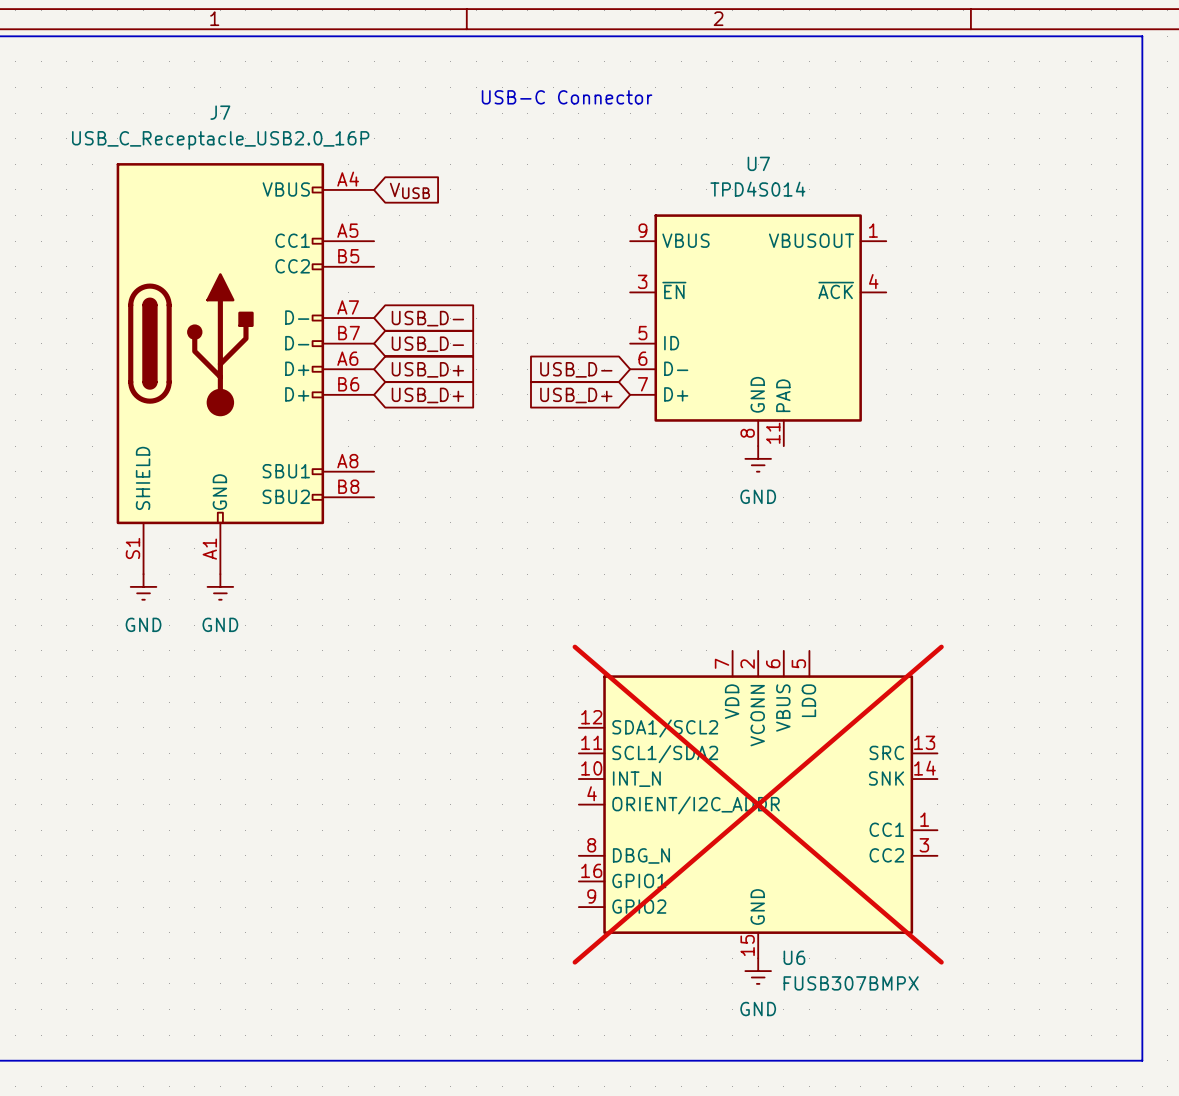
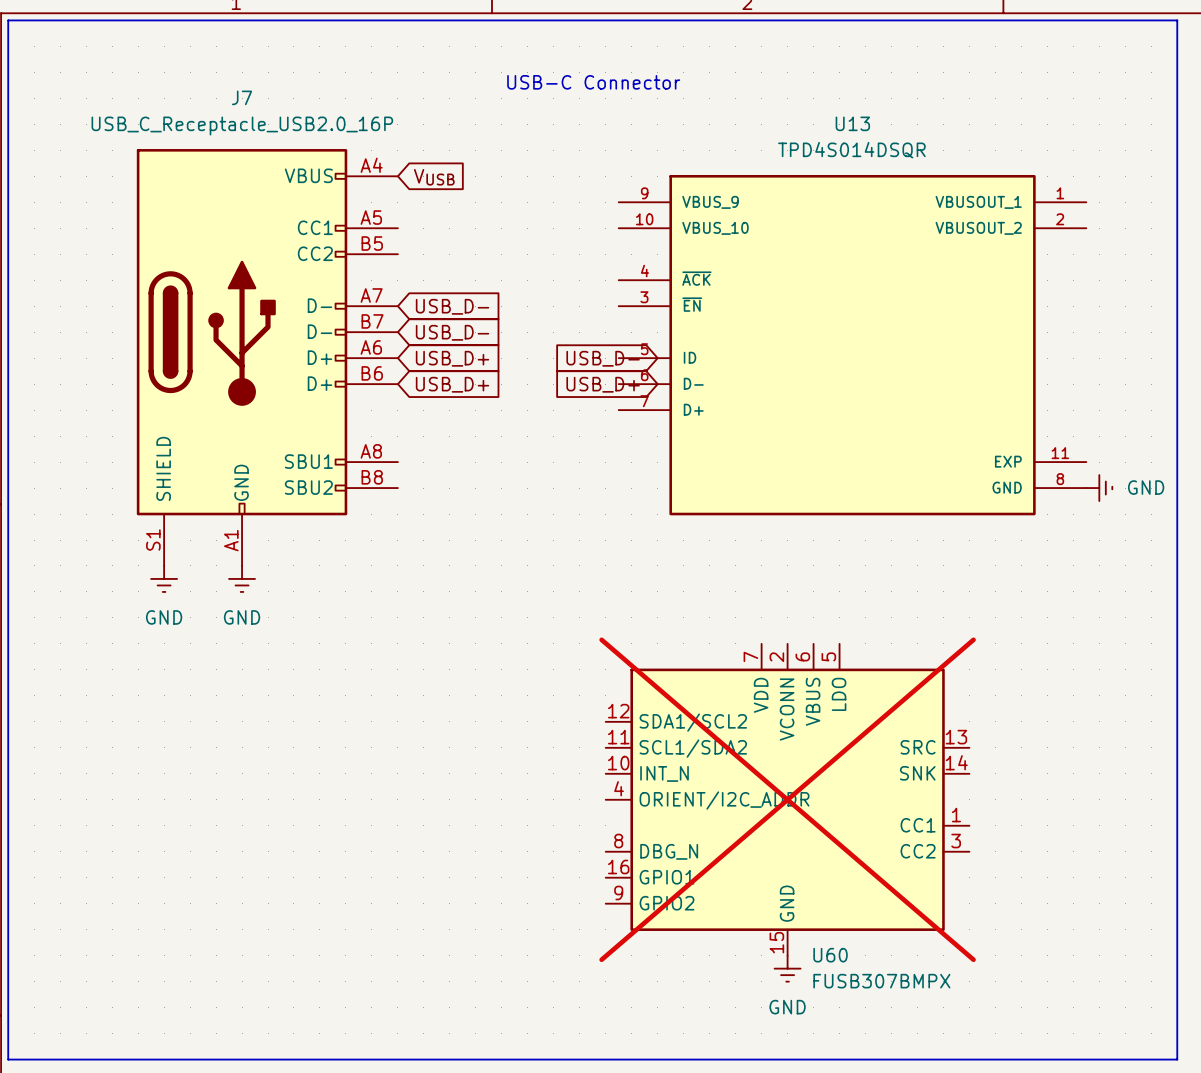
U7: TPD4S014 (758, 330) -> none
U13: none -> TPD4S014DSQR (852, 345)
power symbol: GND (758, 458) -> none
power symbol: none -> GND (1099, 488)
U6 name: U6 (794, 957) -> U60 (830, 955)

